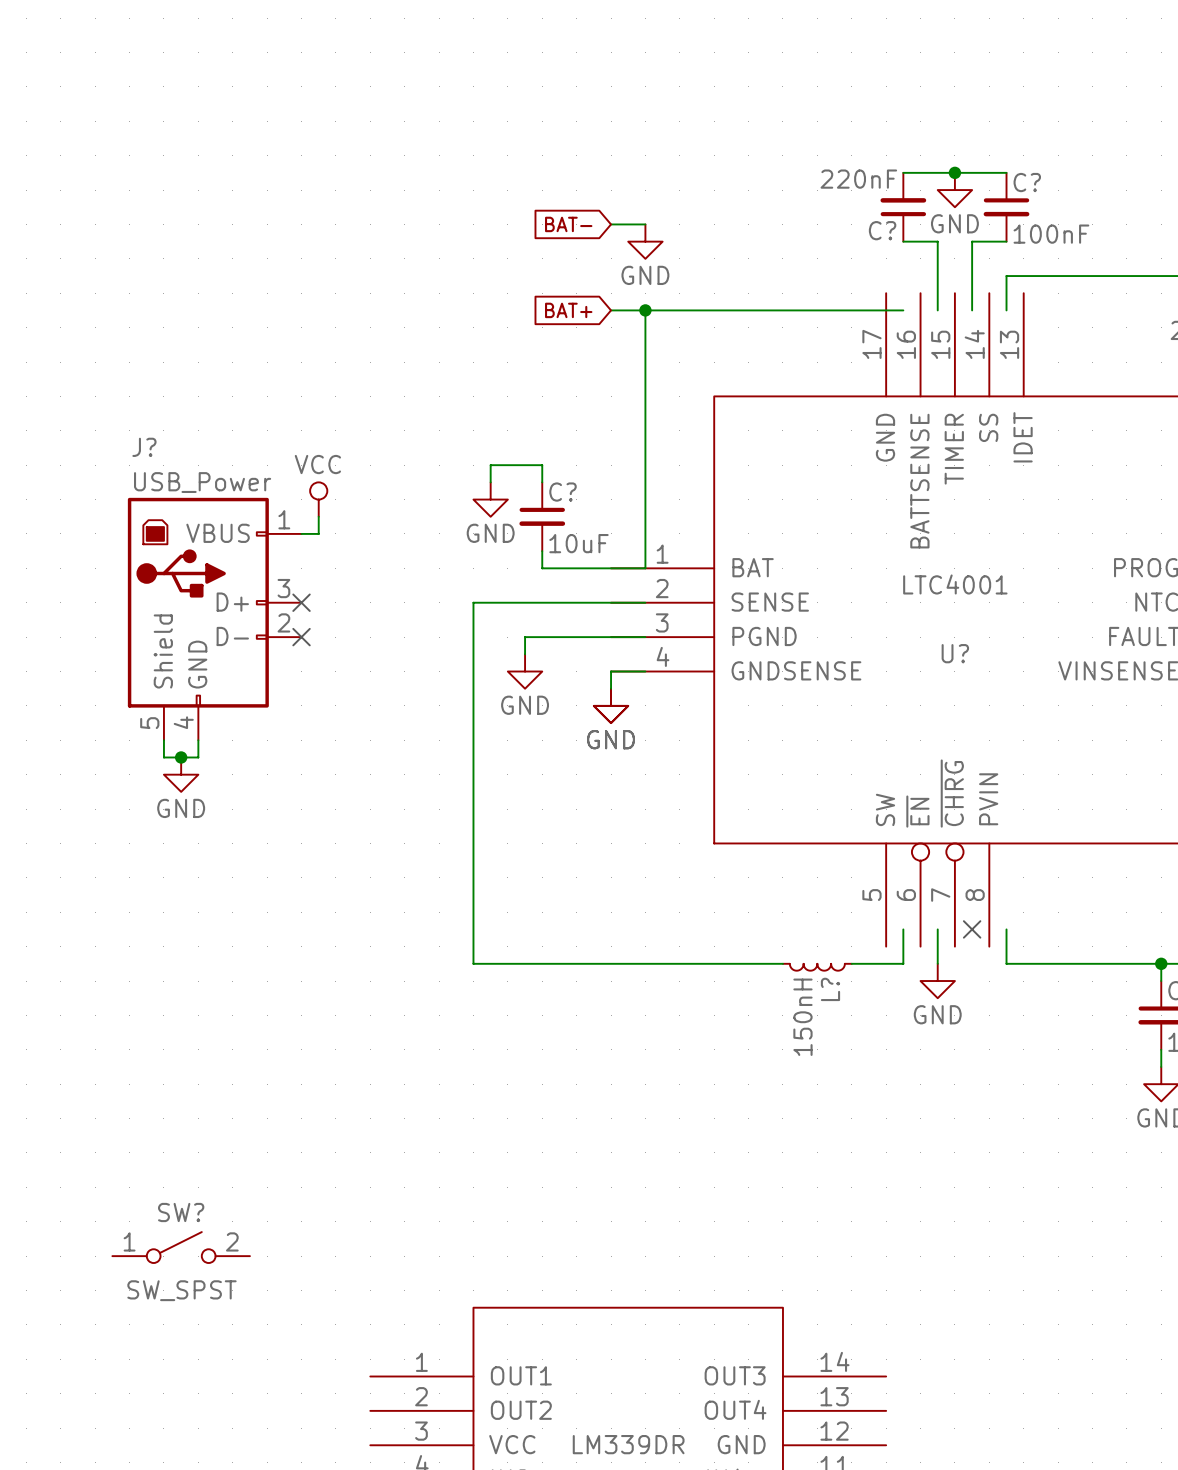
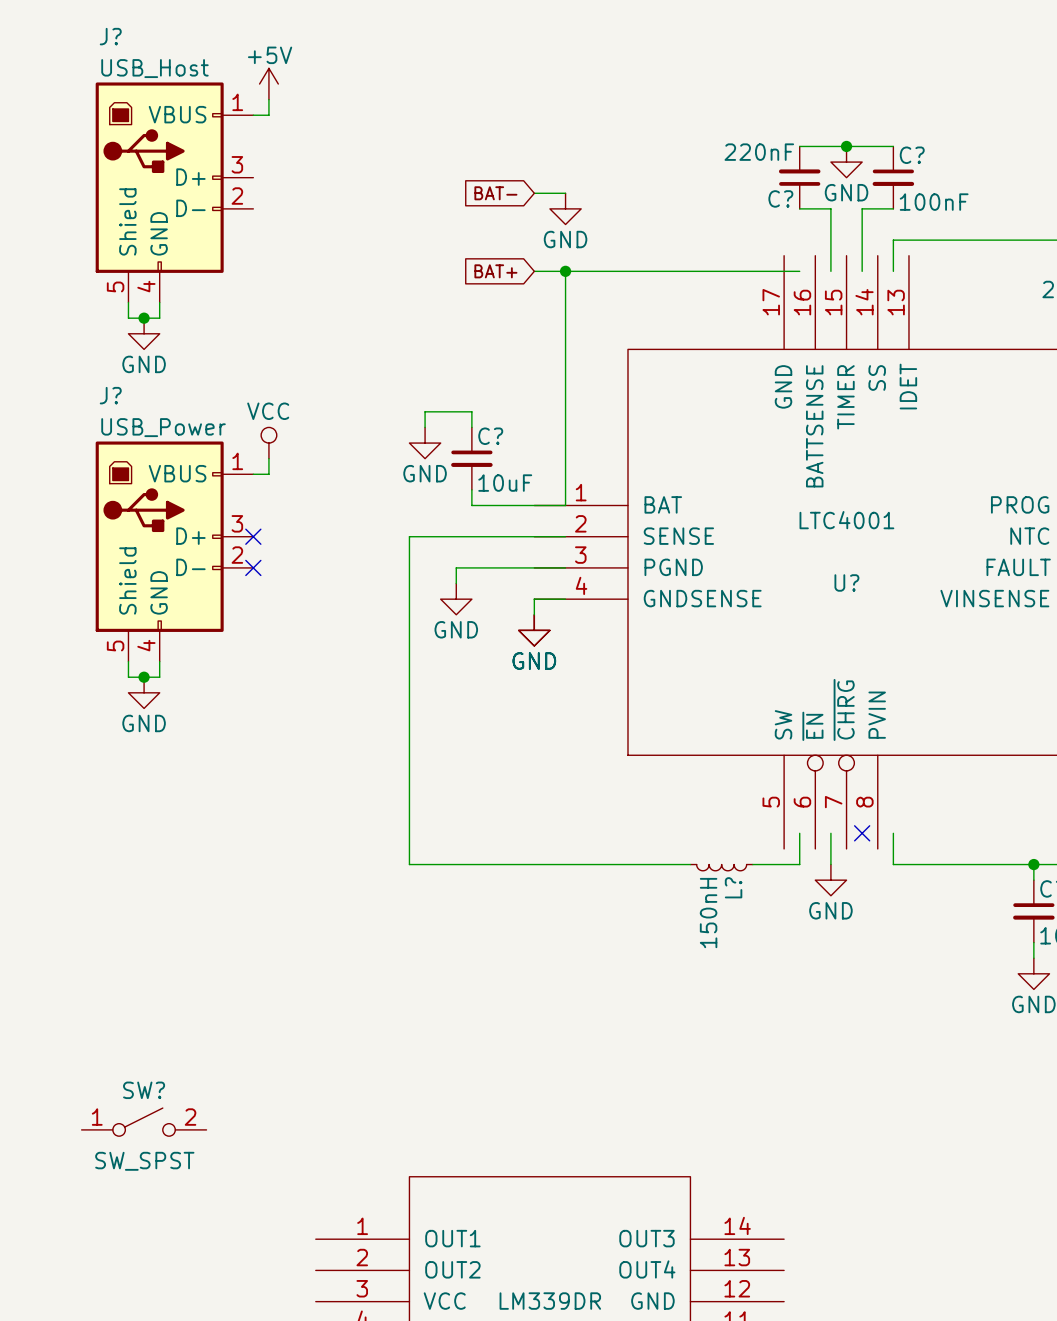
power symbol: none -> +5V (268, 84)
wire: none -> (268, 99) (268, 115) (253, 115)
J?: none -> USB_Host (174, 192)
wire: none -> (128, 302) (128, 318) (159, 318) (159, 302)
junction: none -> (144, 318)
power symbol: none -> GND (144, 333)

